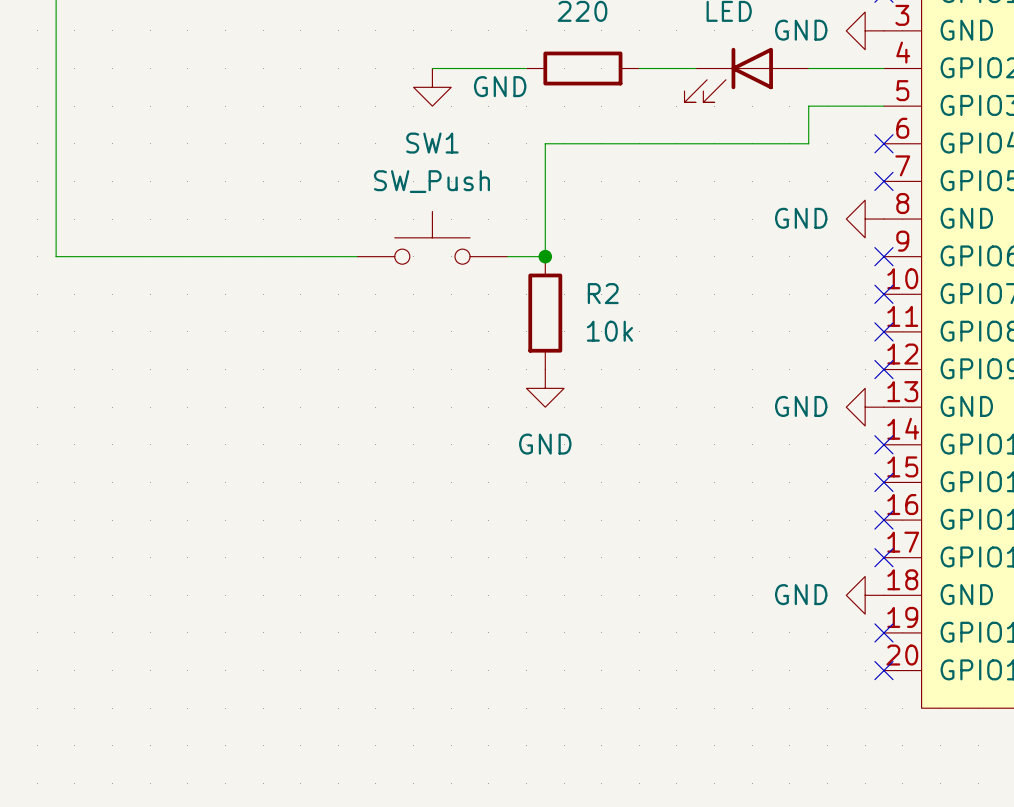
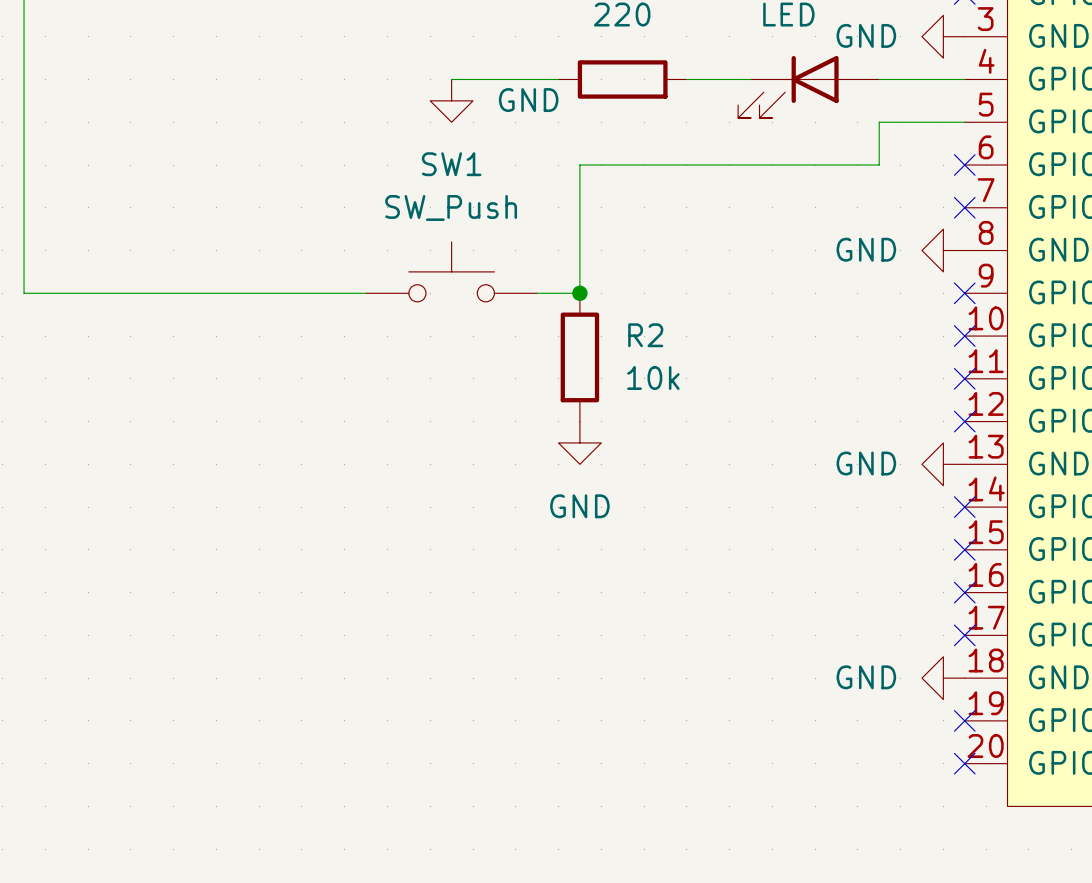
power symbol text position: GND (801, 30) -> GND (866, 35)
power symbol text position: GND (801, 218) -> GND (866, 249)
power symbol text position: GND (801, 406) -> GND (866, 463)
power symbol text position: GND (801, 594) -> GND (866, 677)

